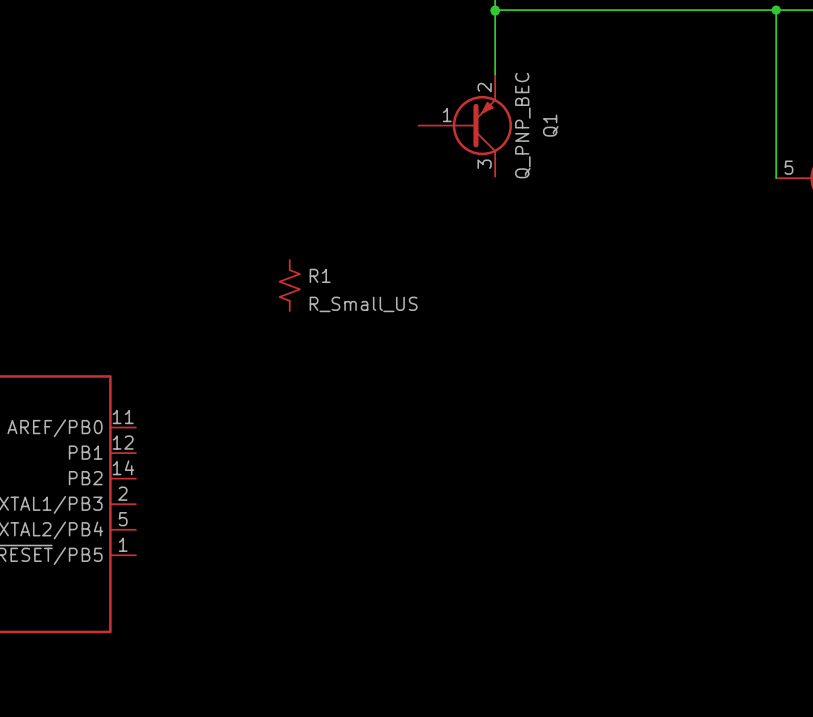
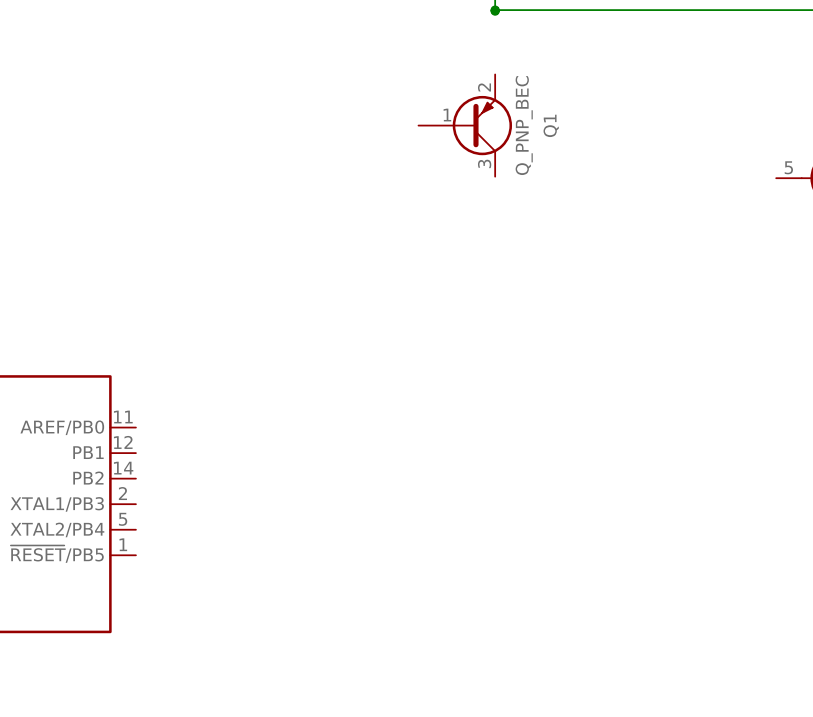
wire: (776, 10) (776, 178) -> none
junction: (776, 10) -> none
wire: (495, 11) (495, 74) -> none
R1: R_Small_US (289, 285) -> none

